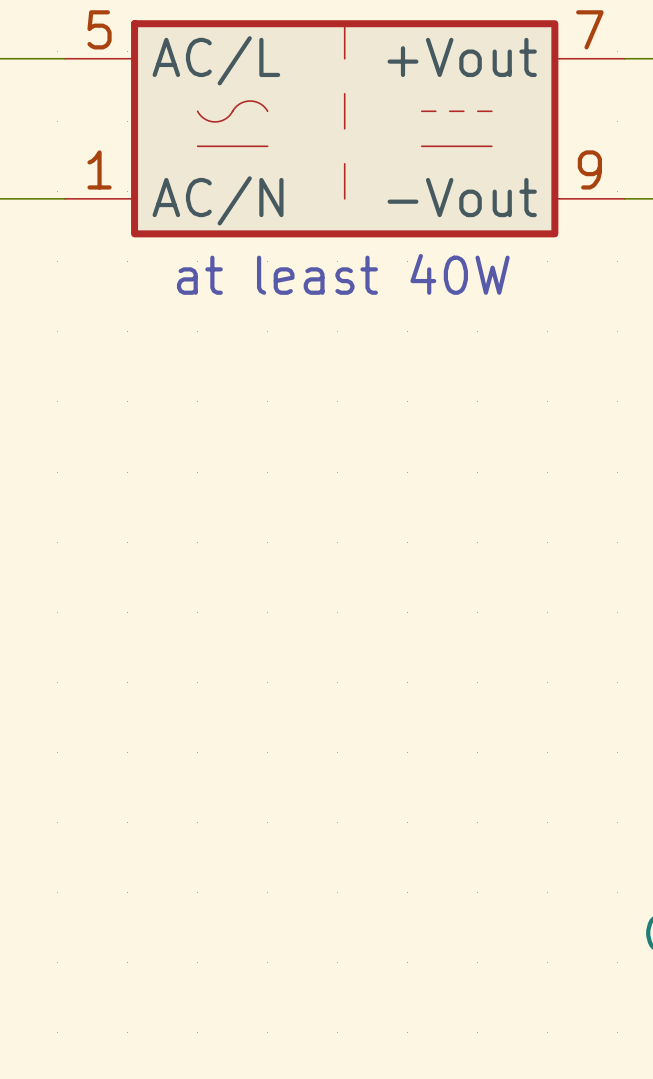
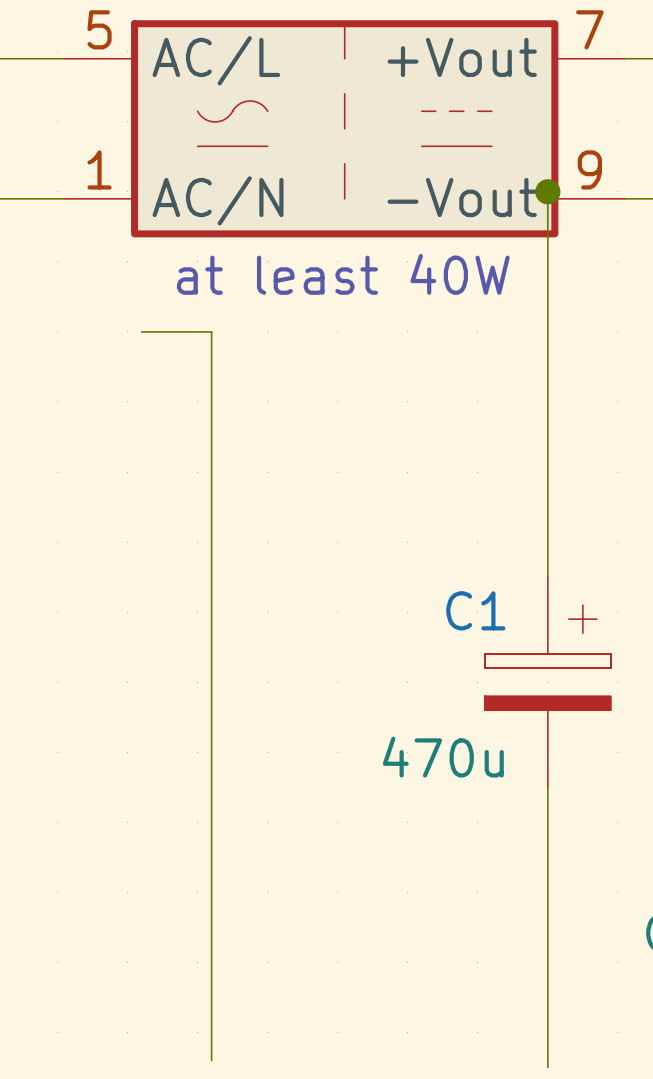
wire: none -> (547, 191) (547, 577)
junction: none -> (547, 191)
wire: none -> (141, 331) (211, 331) (211, 1060)
C1: none -> 470u (547, 682)
wire: none -> (547, 787) (547, 1067)

